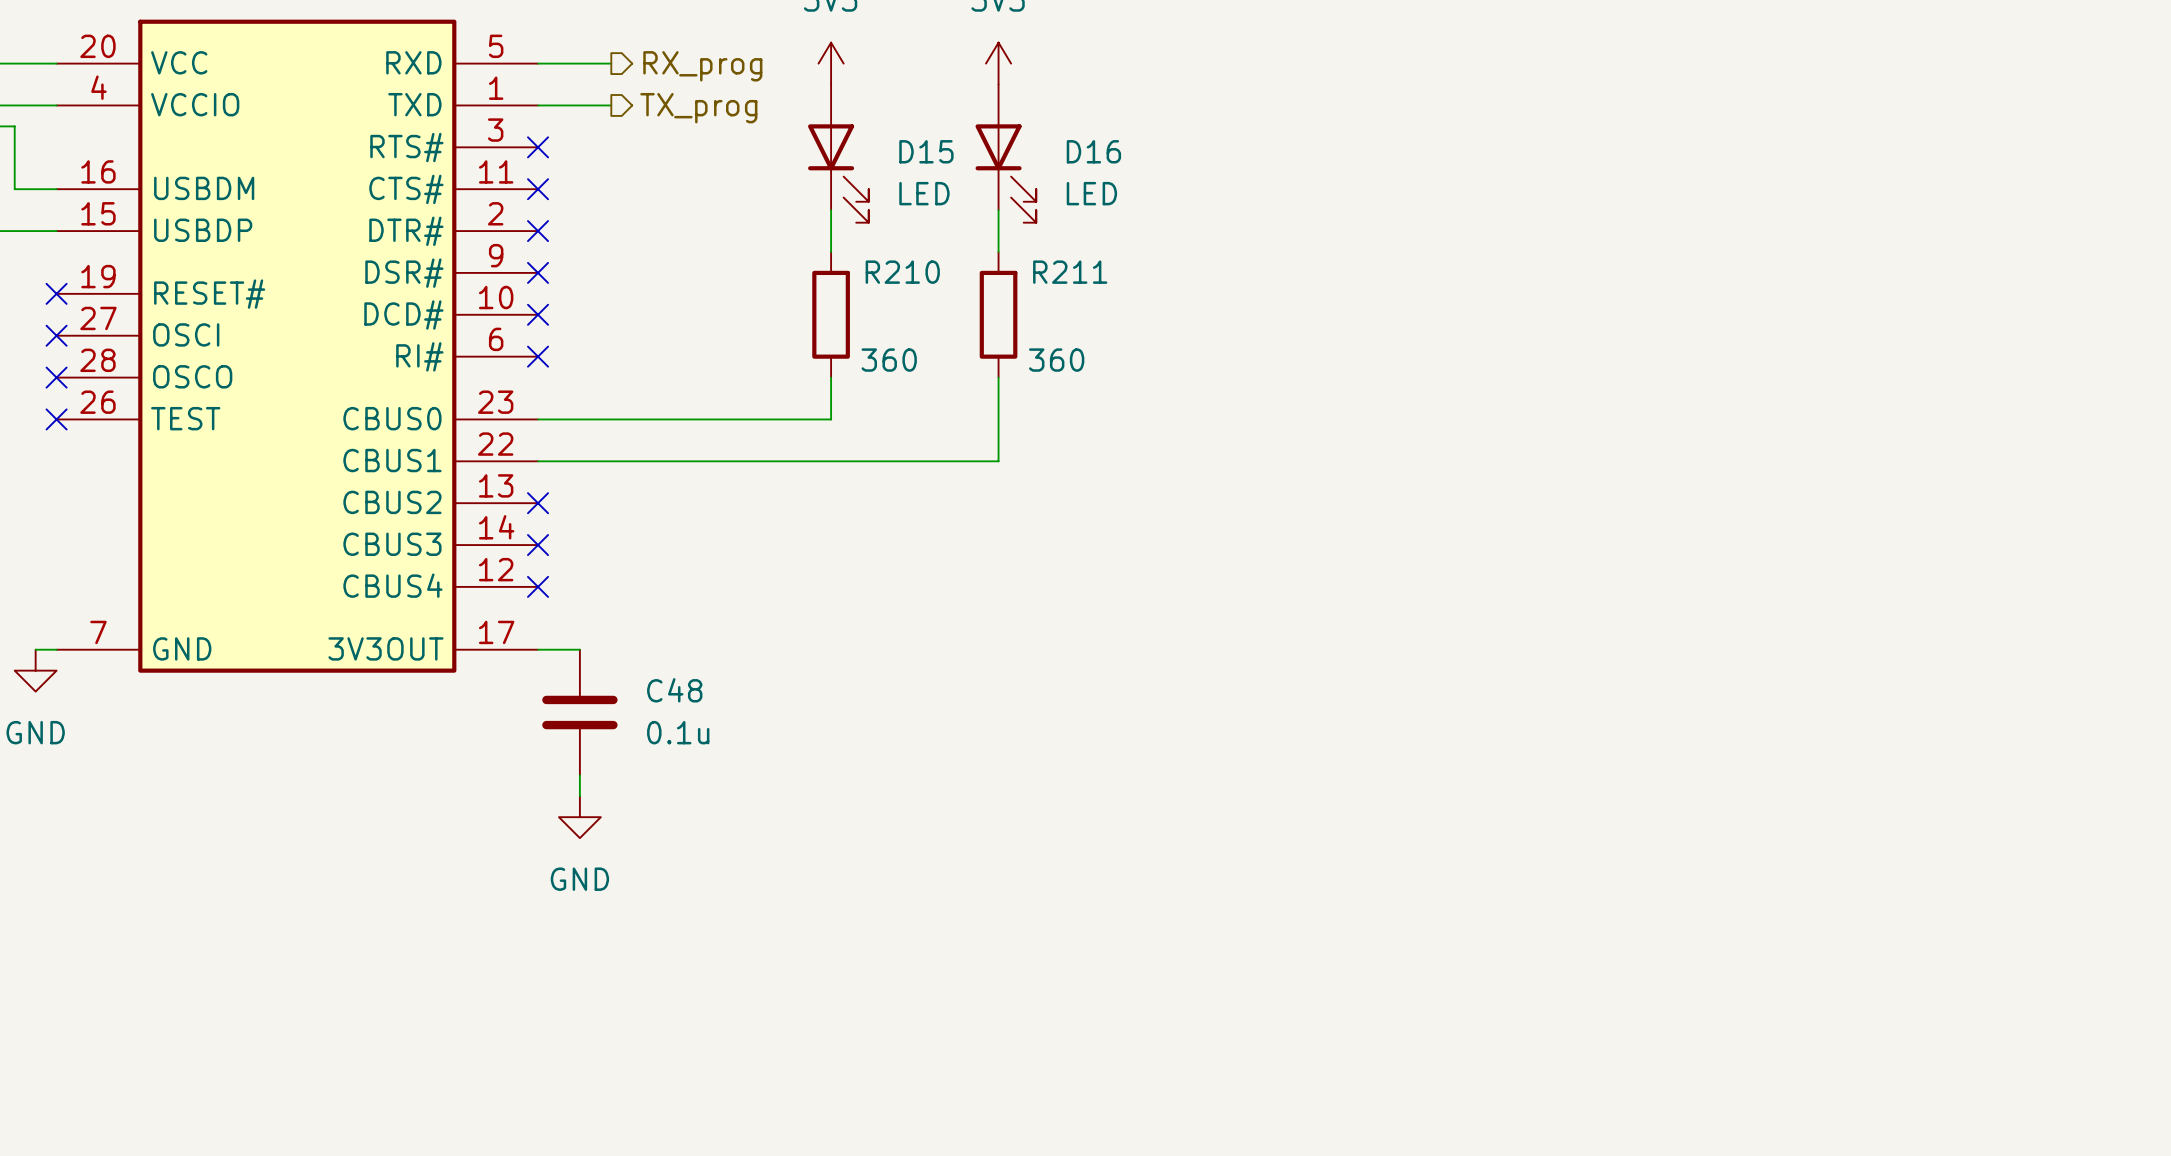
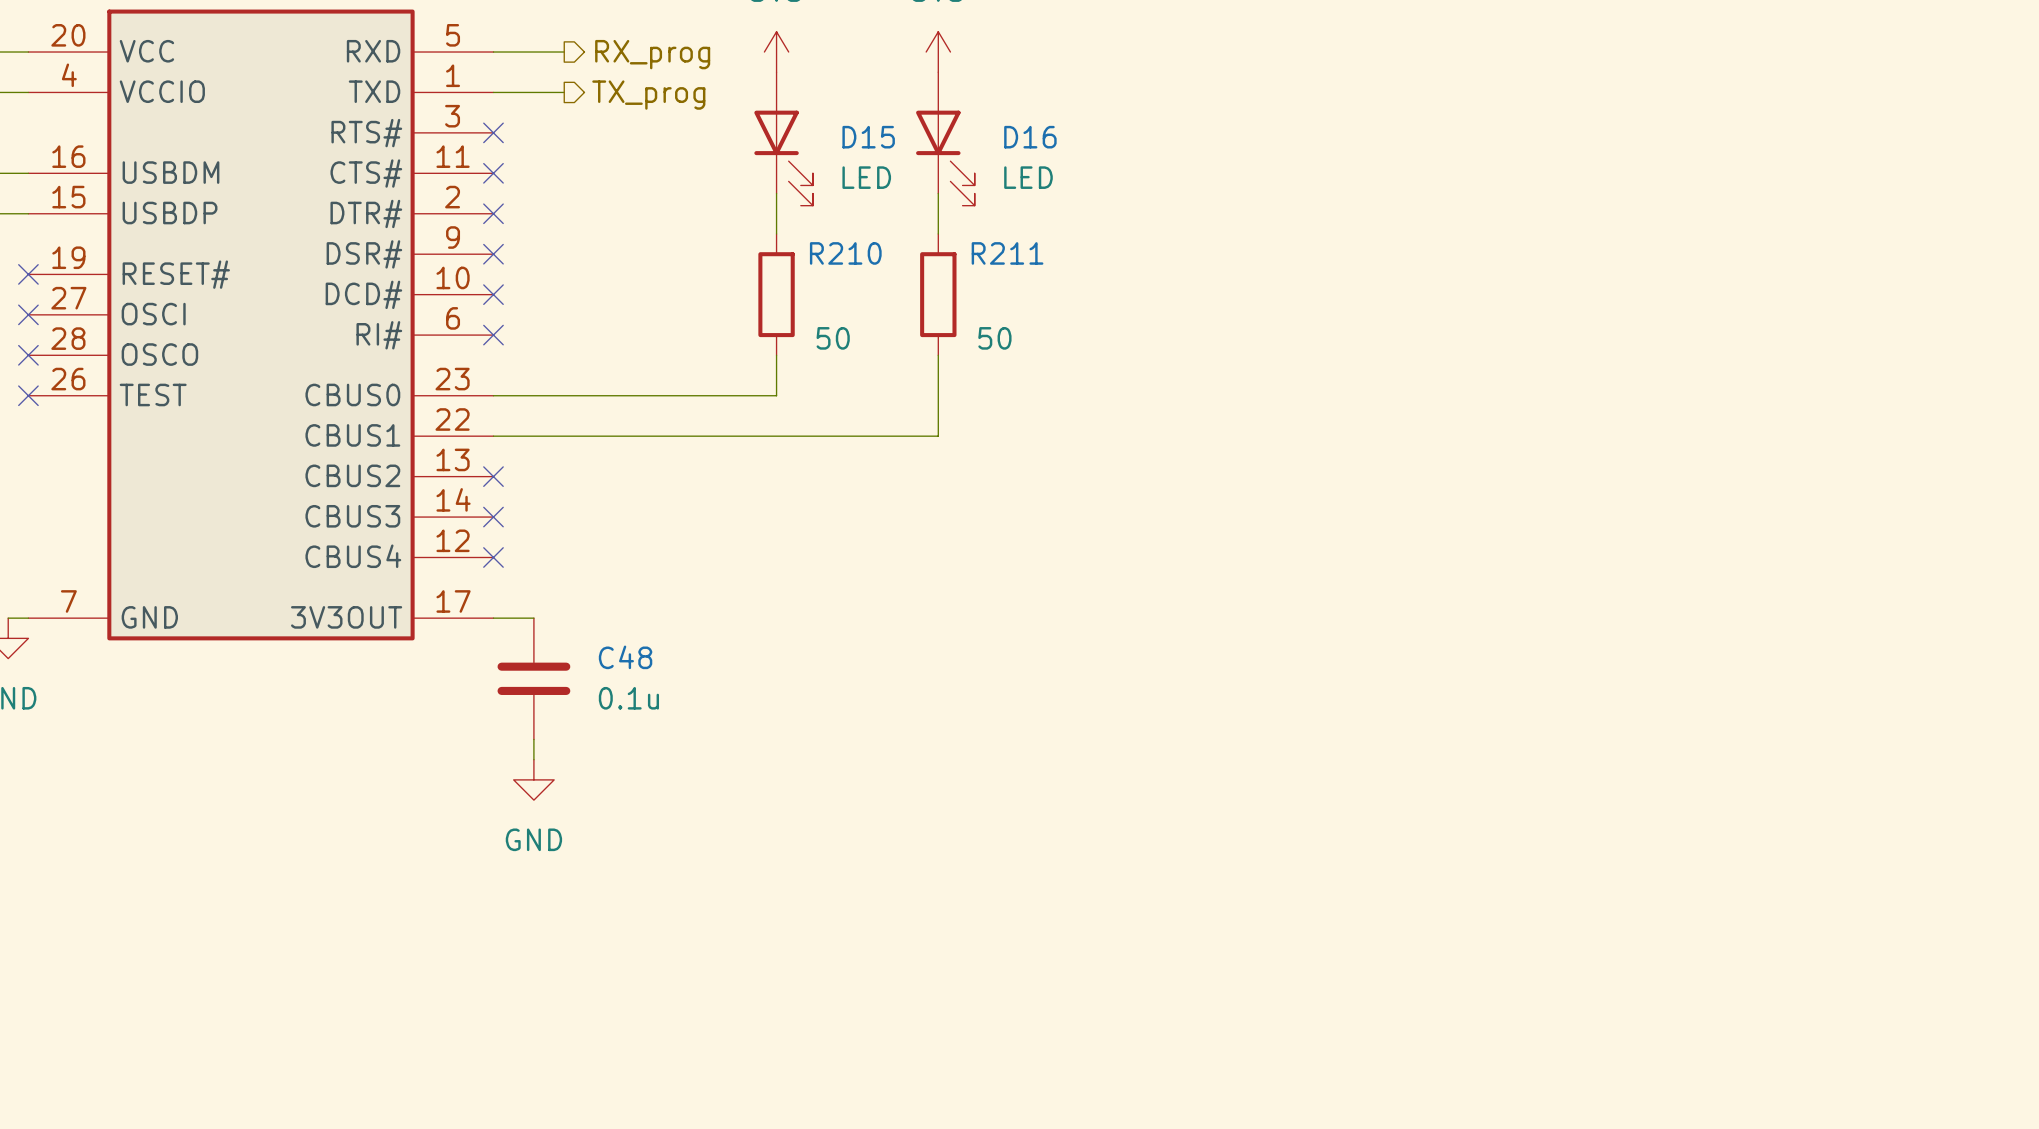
R210 value: 360 (889, 360) -> 50 (833, 338)
R211 value: 360 (1056, 360) -> 50 (994, 338)

